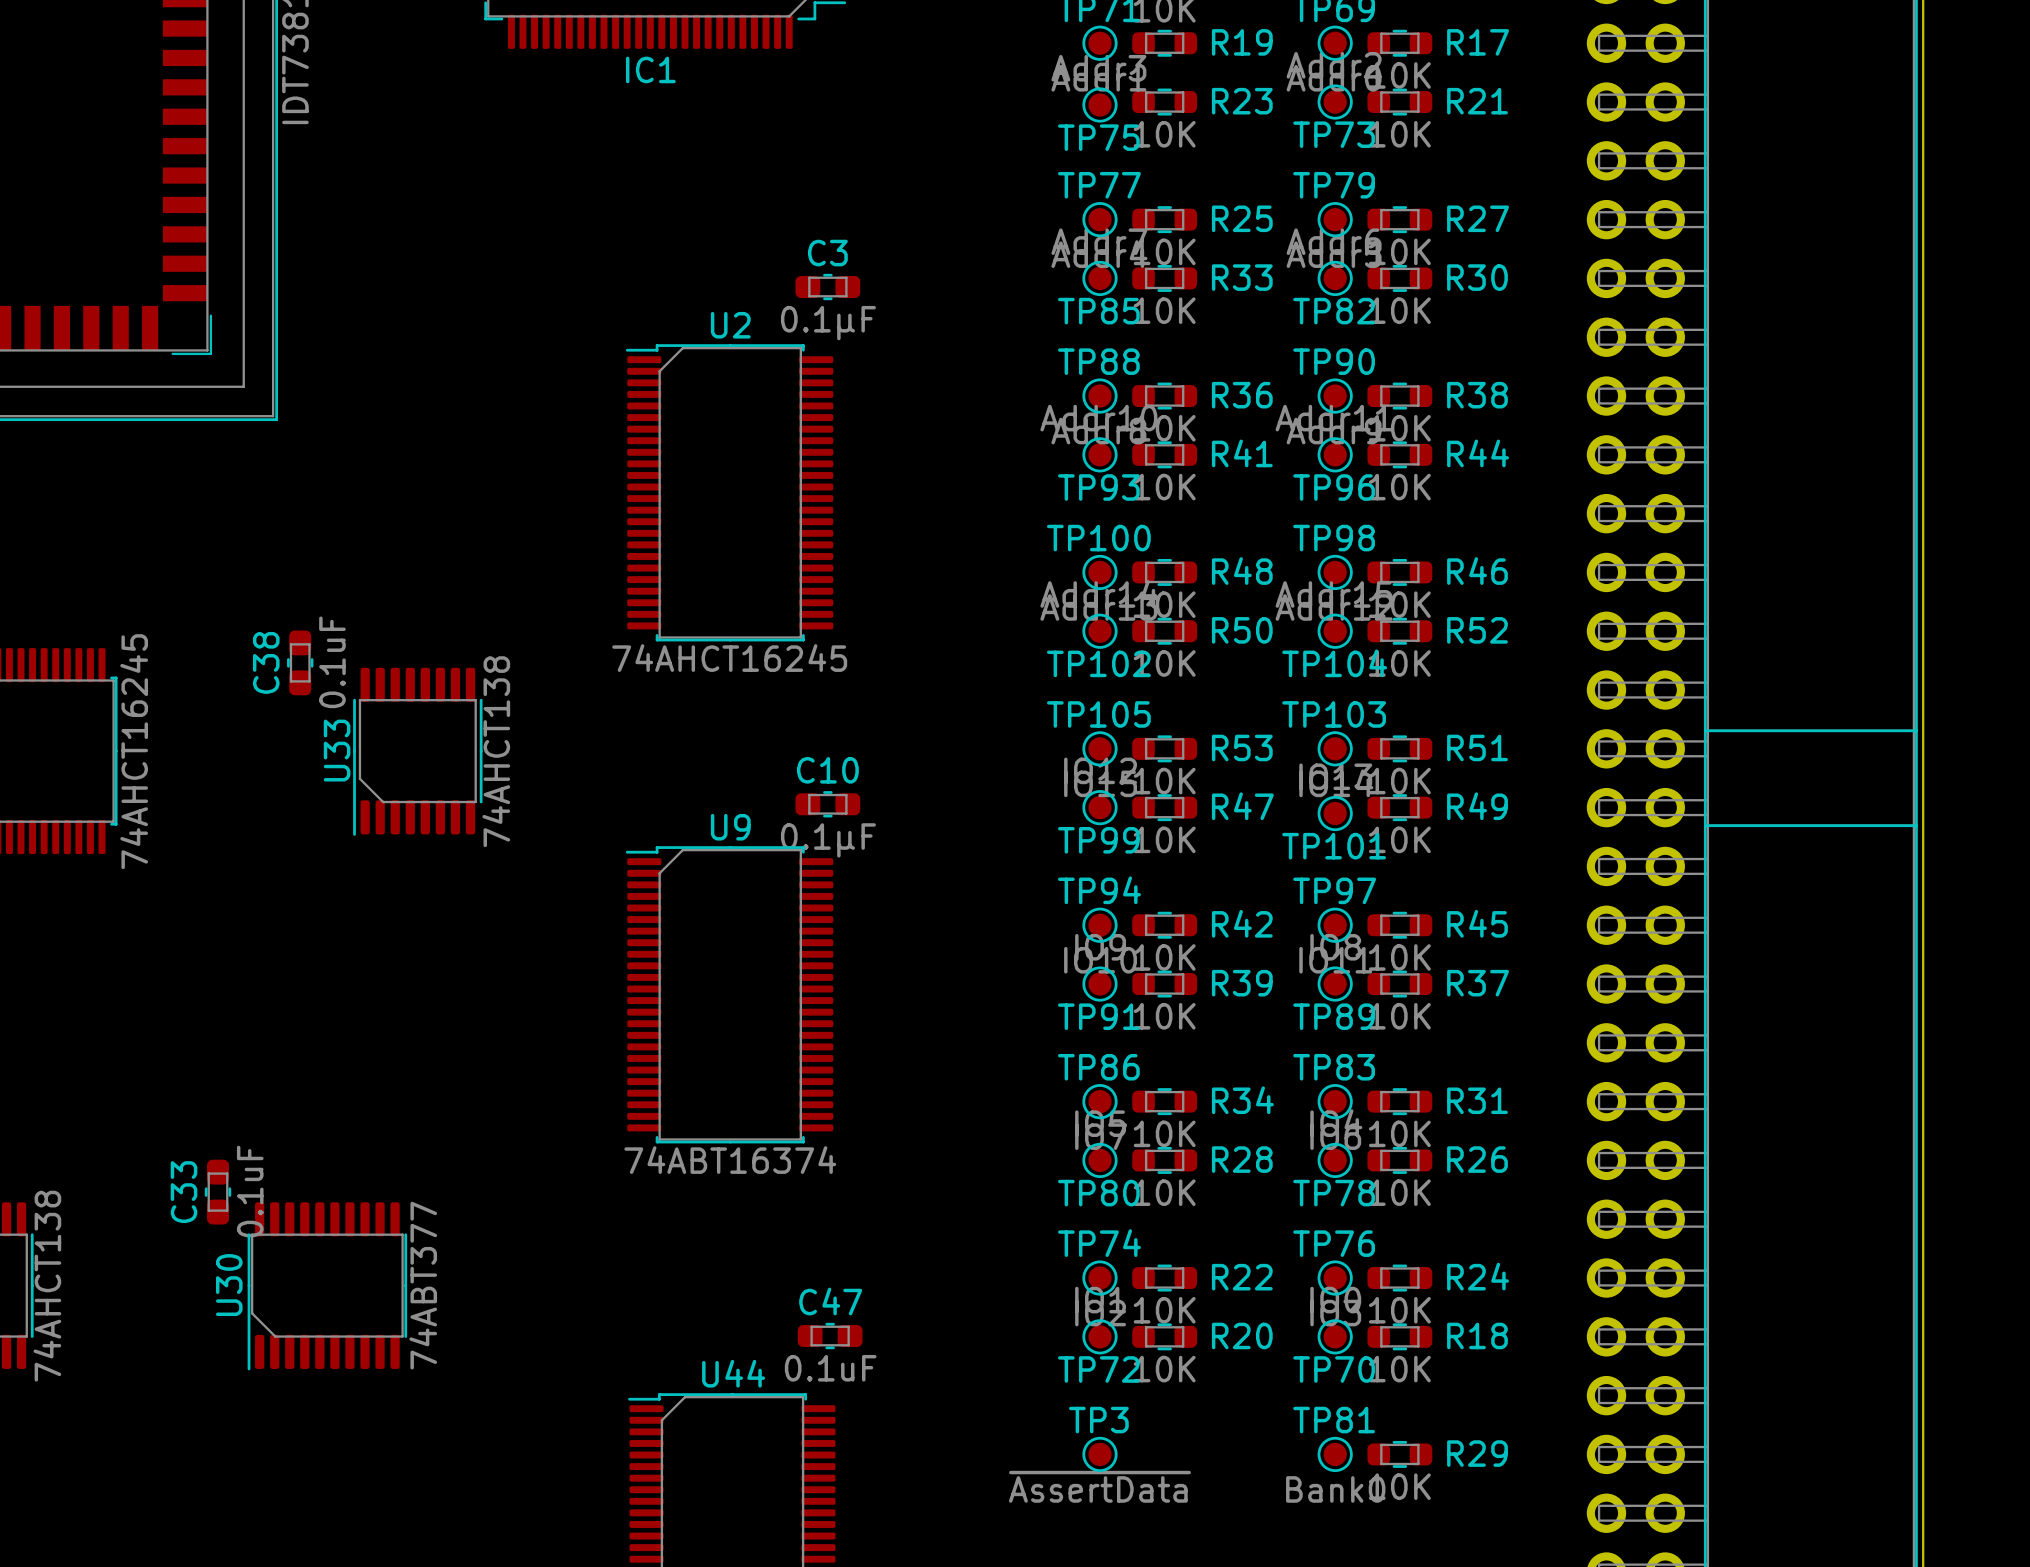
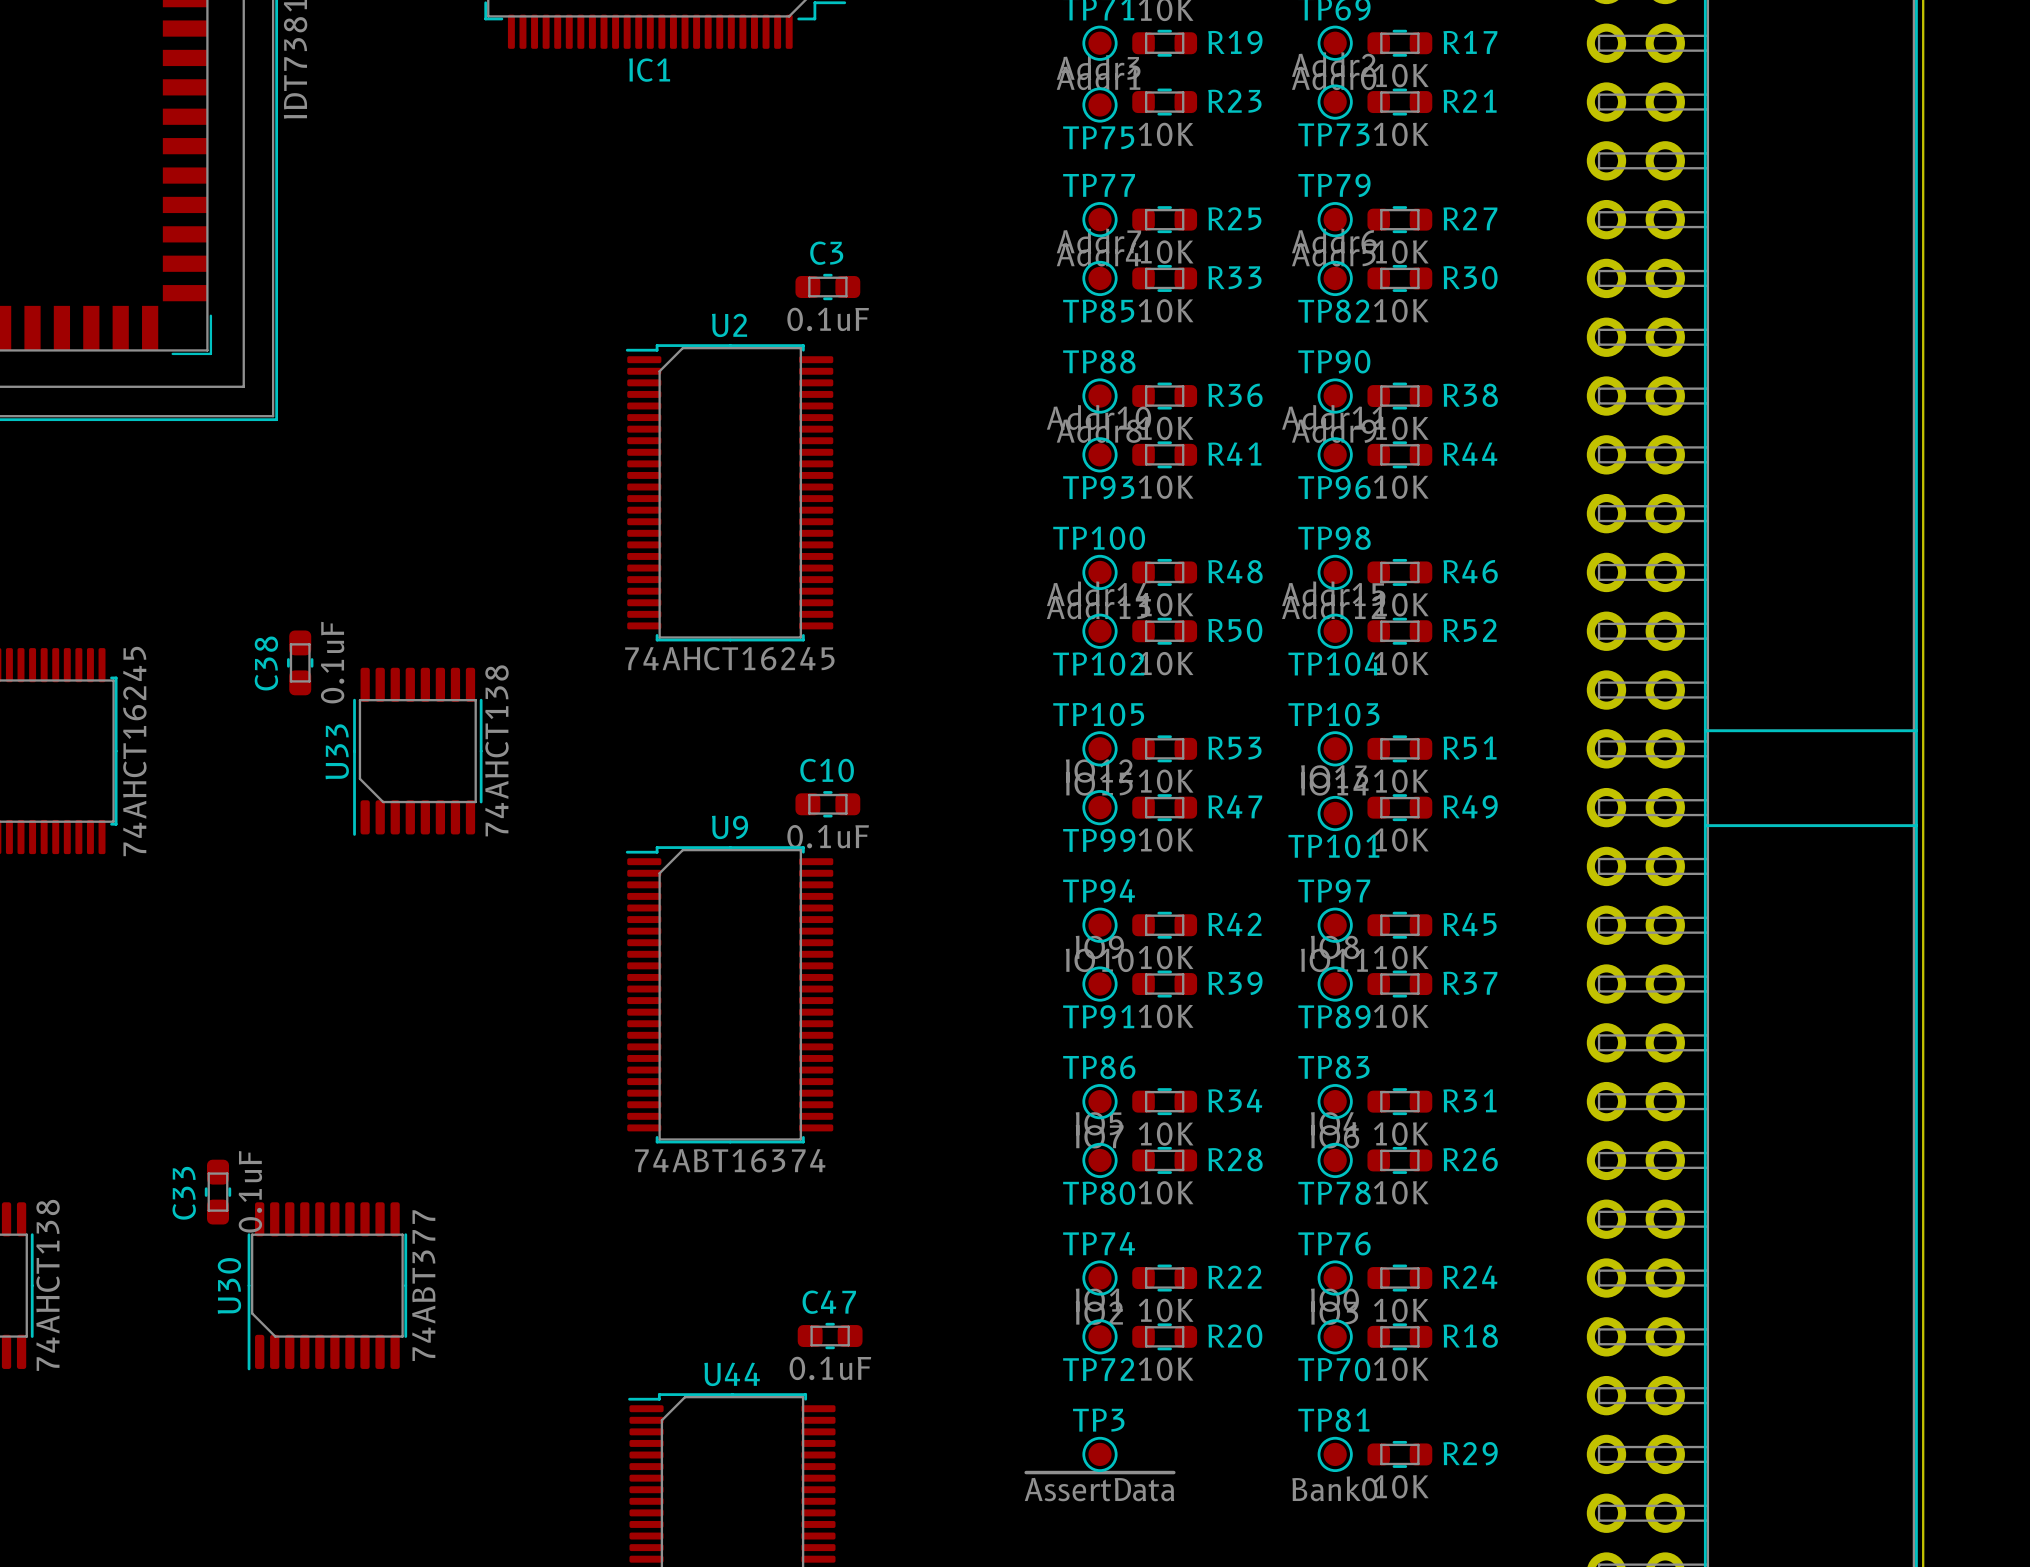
C3 value: 0.1μF (828, 323) -> 0.1uF (828, 319)
C10 value: 0.1μF (828, 840) -> 0.1uF (828, 836)

